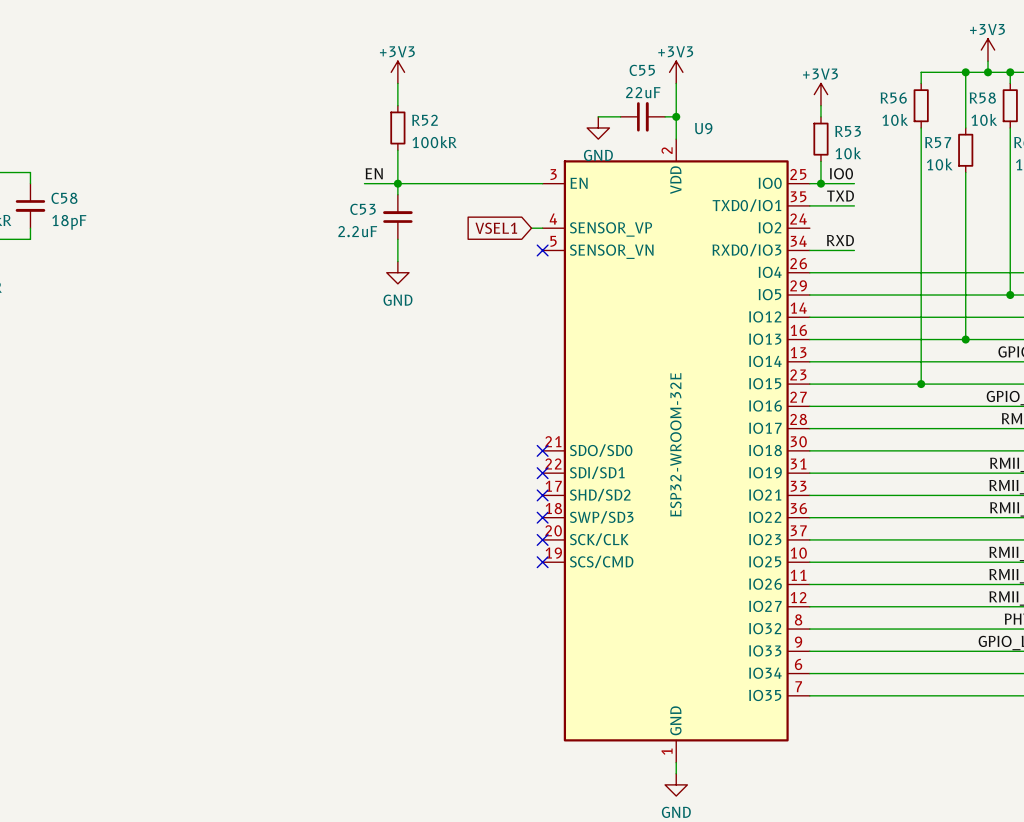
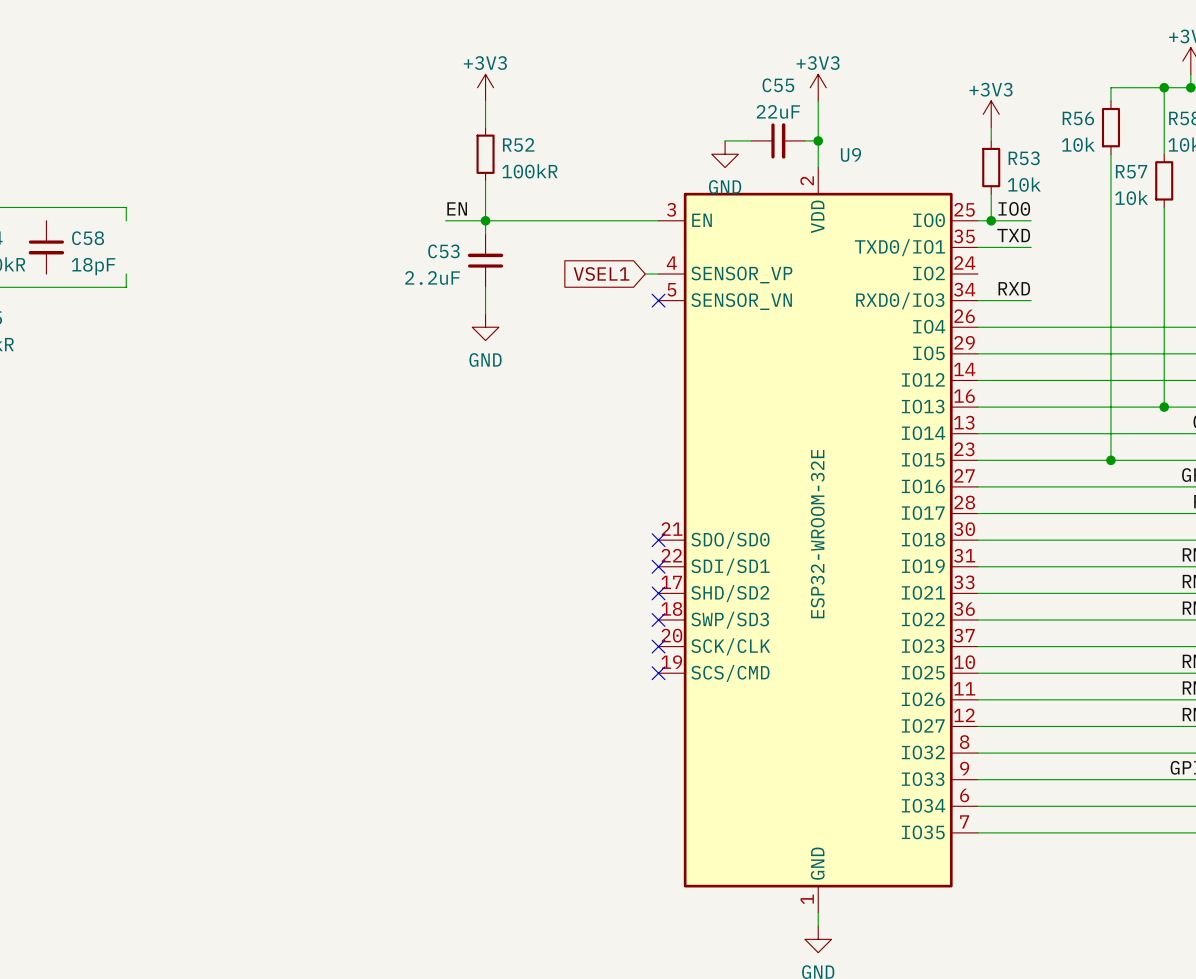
wire: (30, 172) (30, 183) -> (46, 207) (126, 207) (126, 220)
wire: (30, 228) (30, 239) -> (126, 274) (126, 287) (46, 287)

